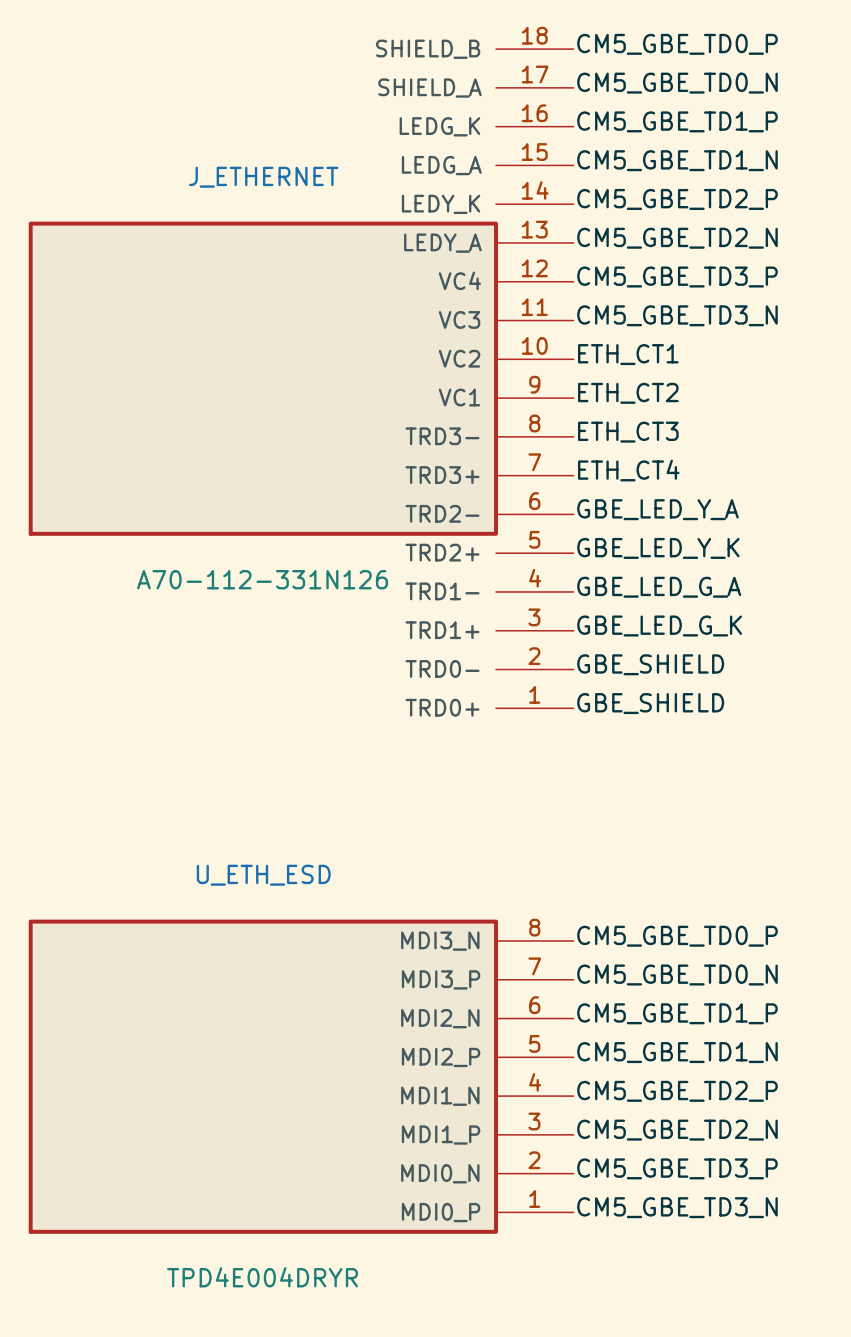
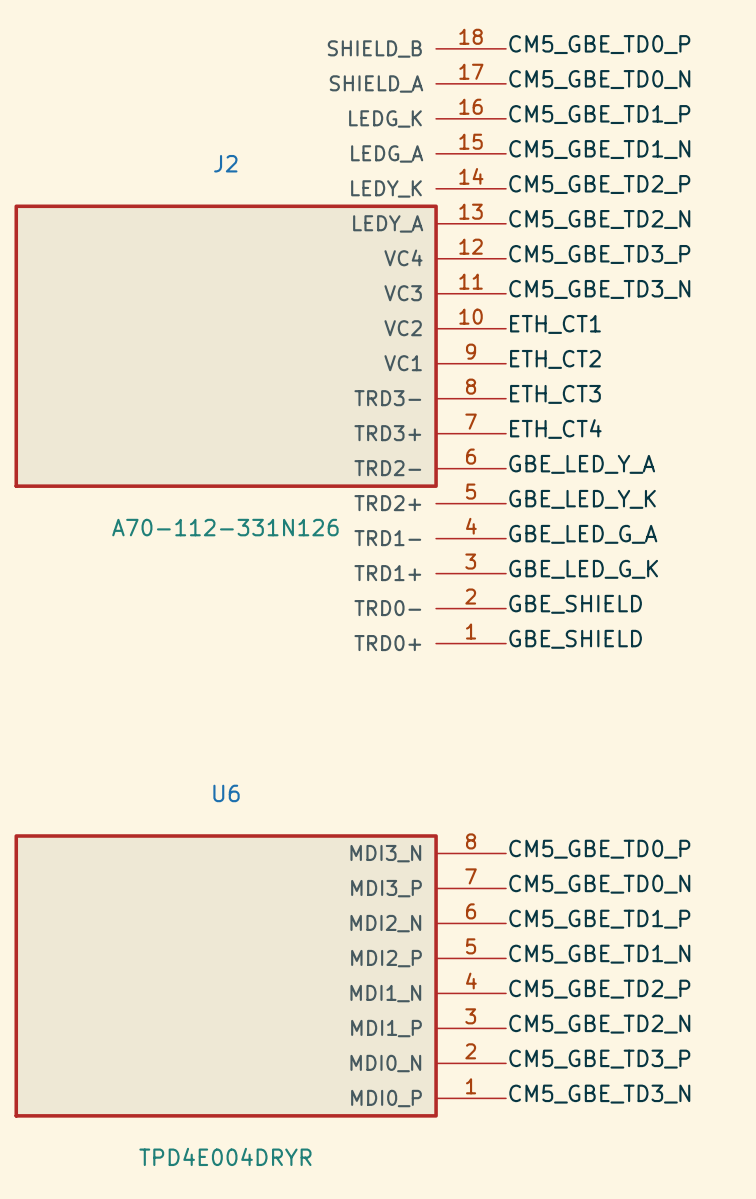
J_ETHERNET name: J_ETHERNET (263, 177) -> J2 (225, 163)
U_ETH_ESD name: U_ETH_ESD (263, 875) -> U6 (226, 793)

